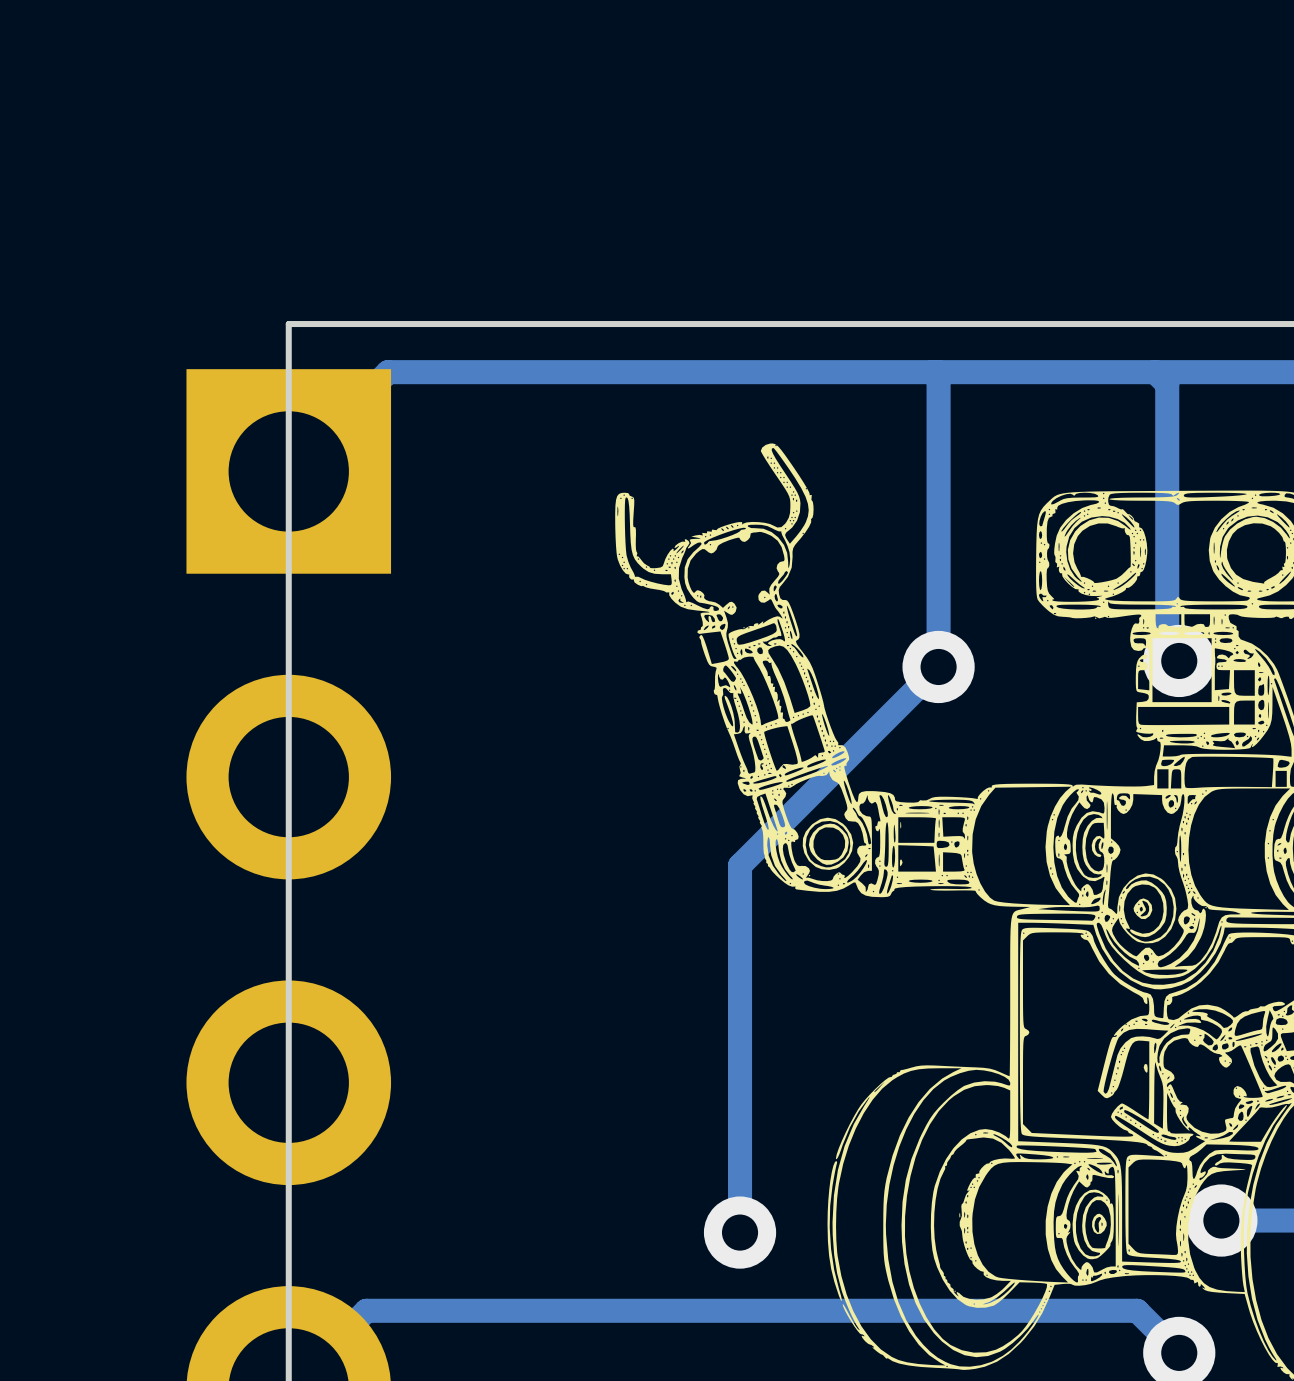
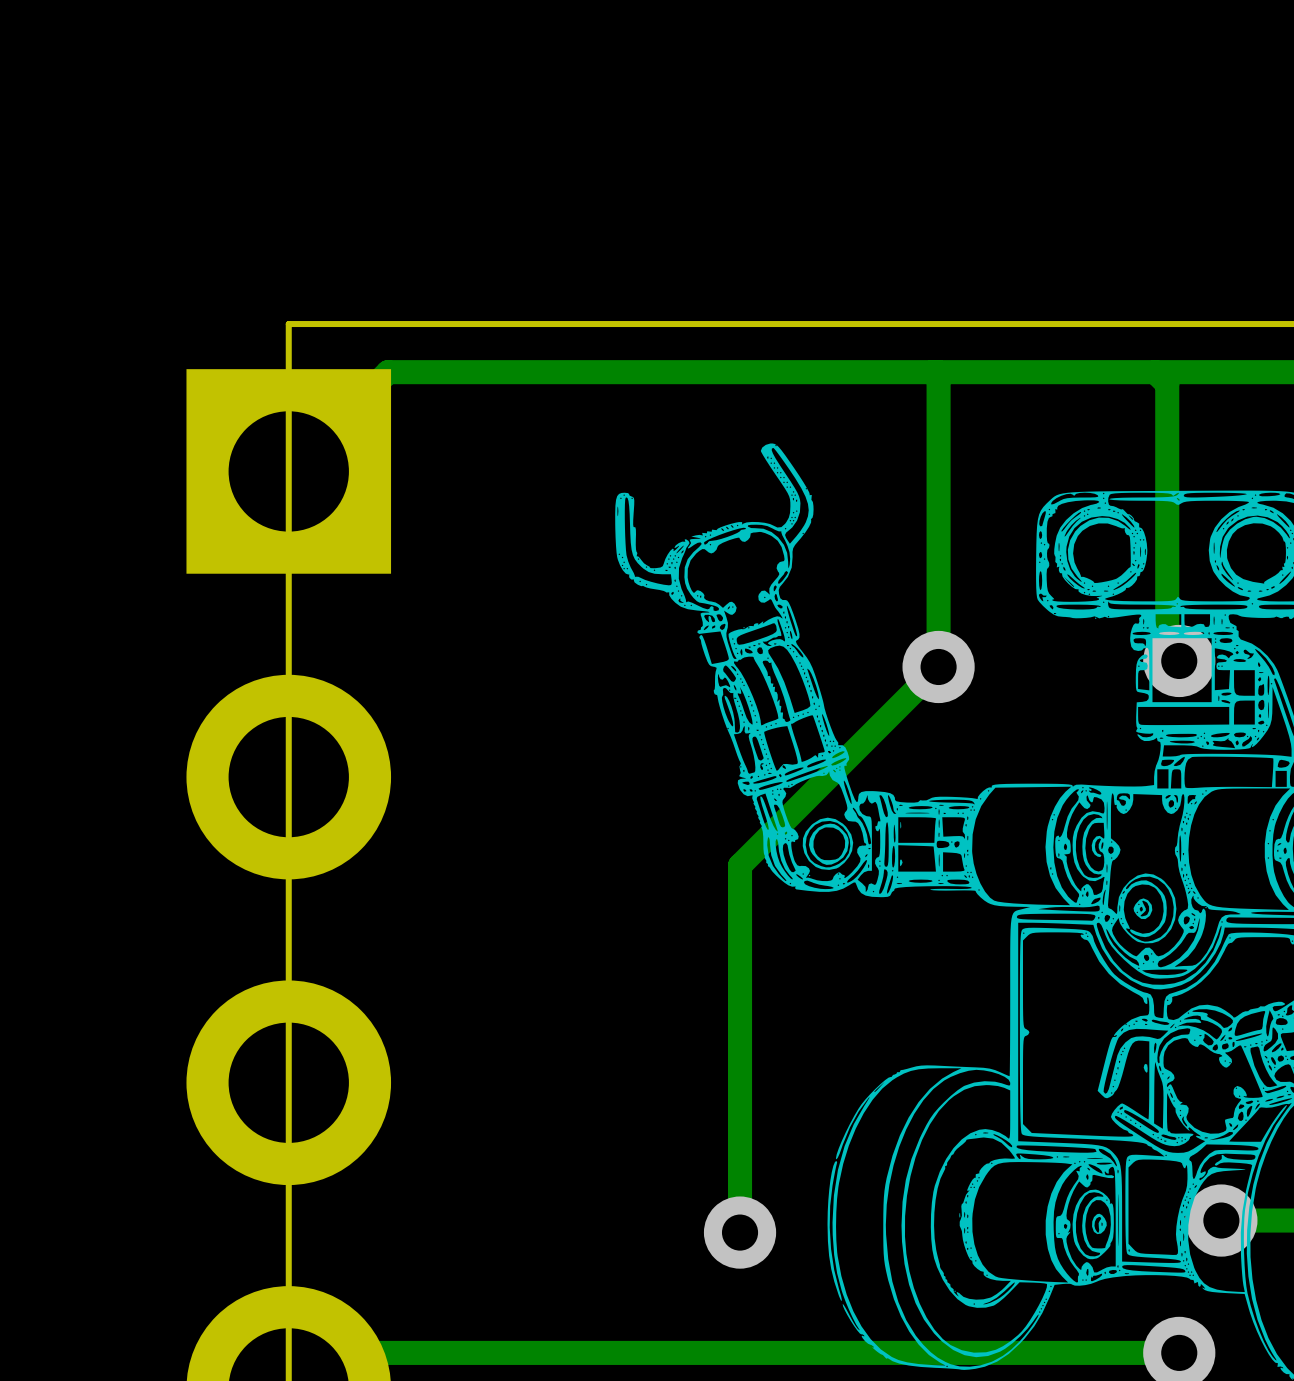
track: (1179, 1352) (1137, 1310) (366, 1310) (324, 1352) -> (1179, 1352) (324, 1352)

